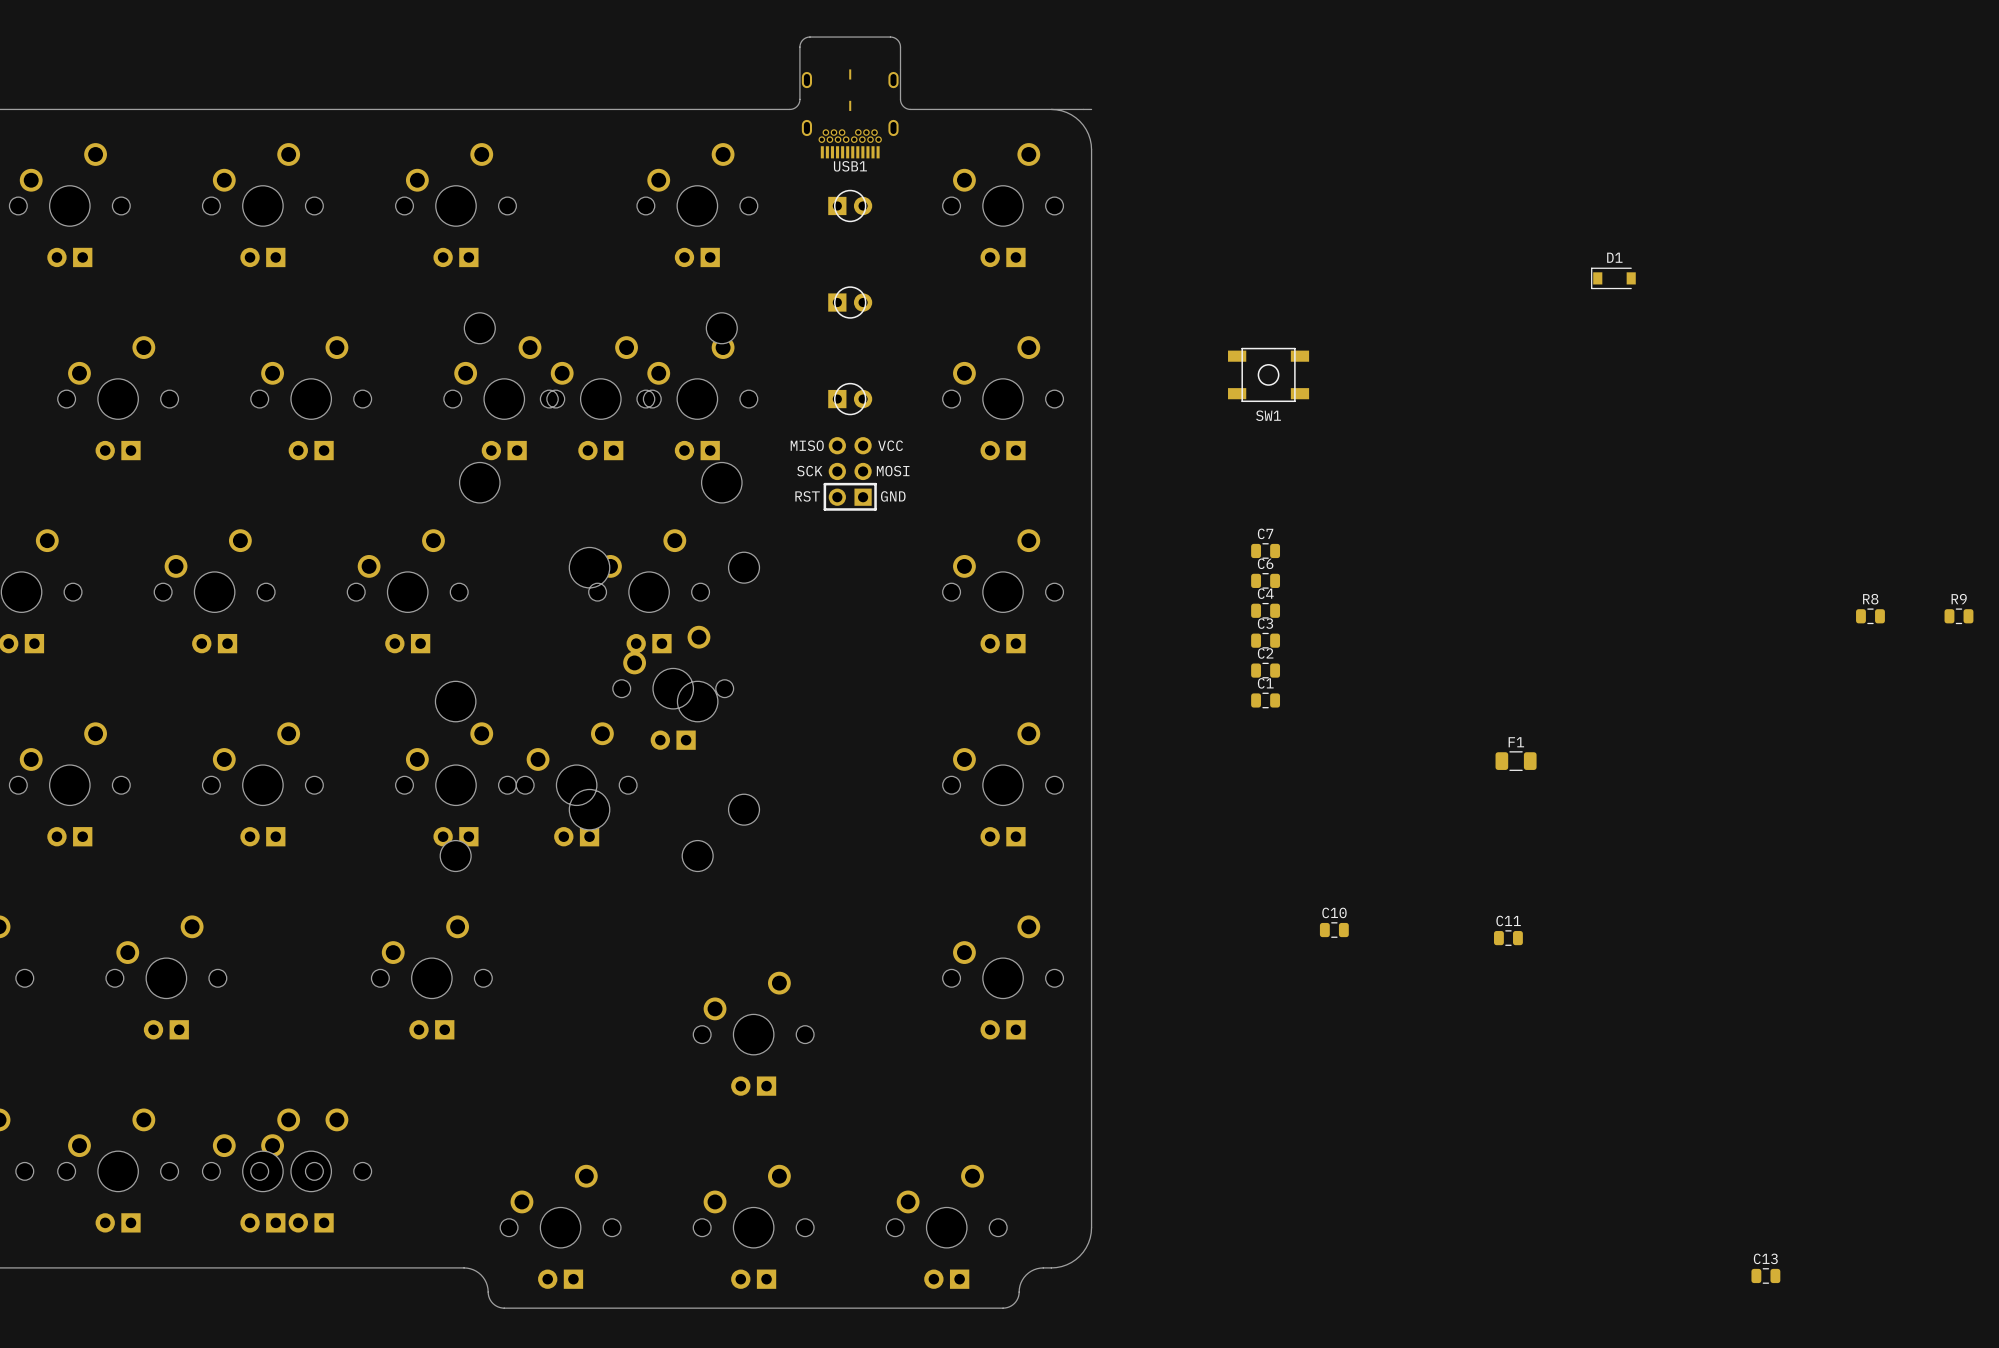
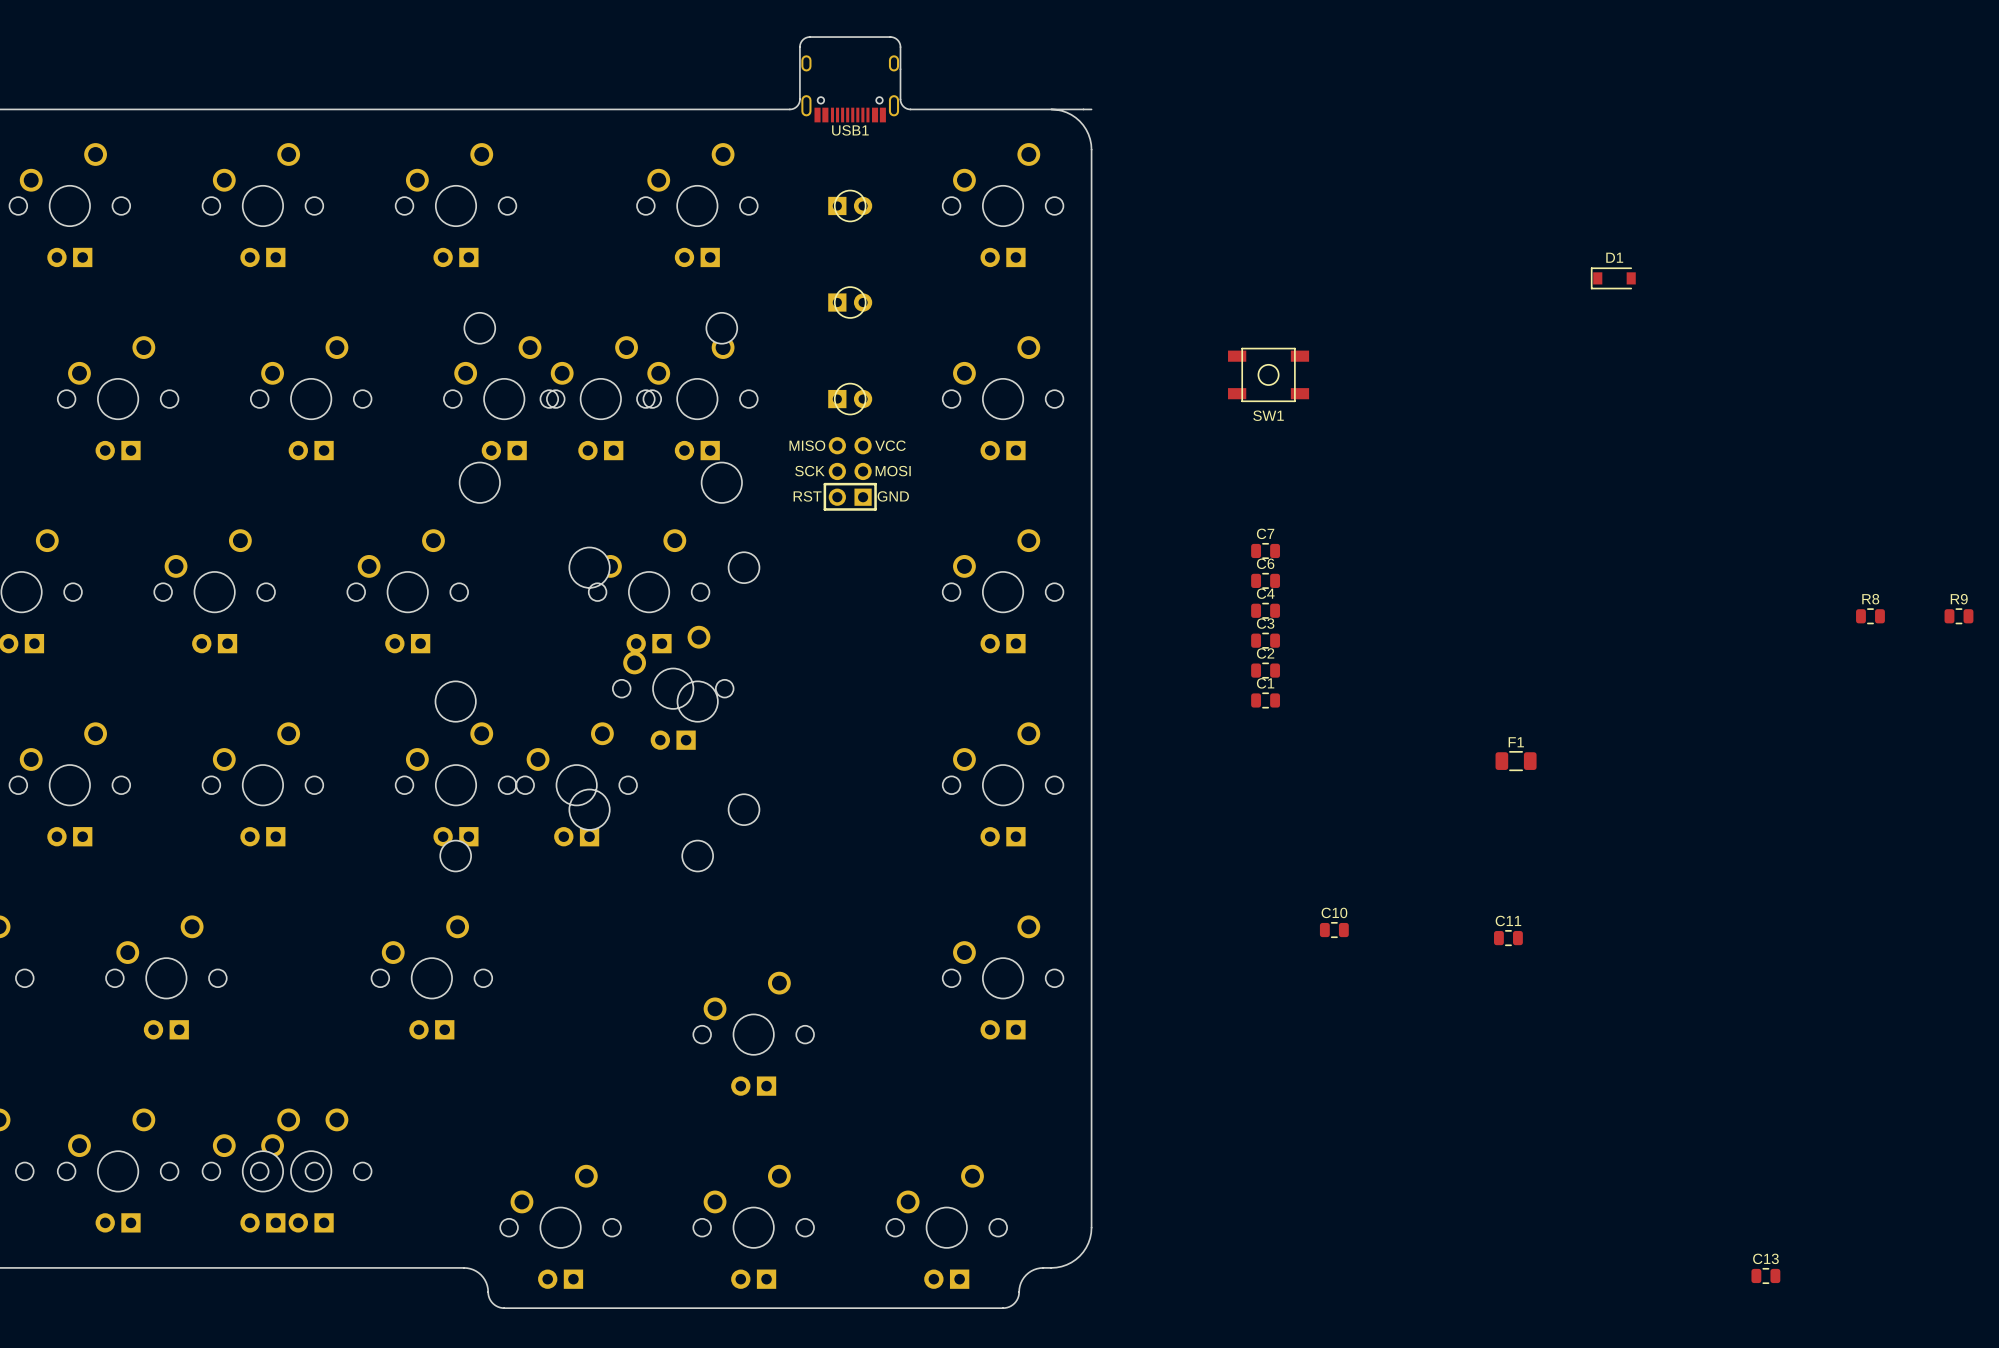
USB1 footprint: [801, 69, 899, 159] -> [801, 55, 900, 123]

